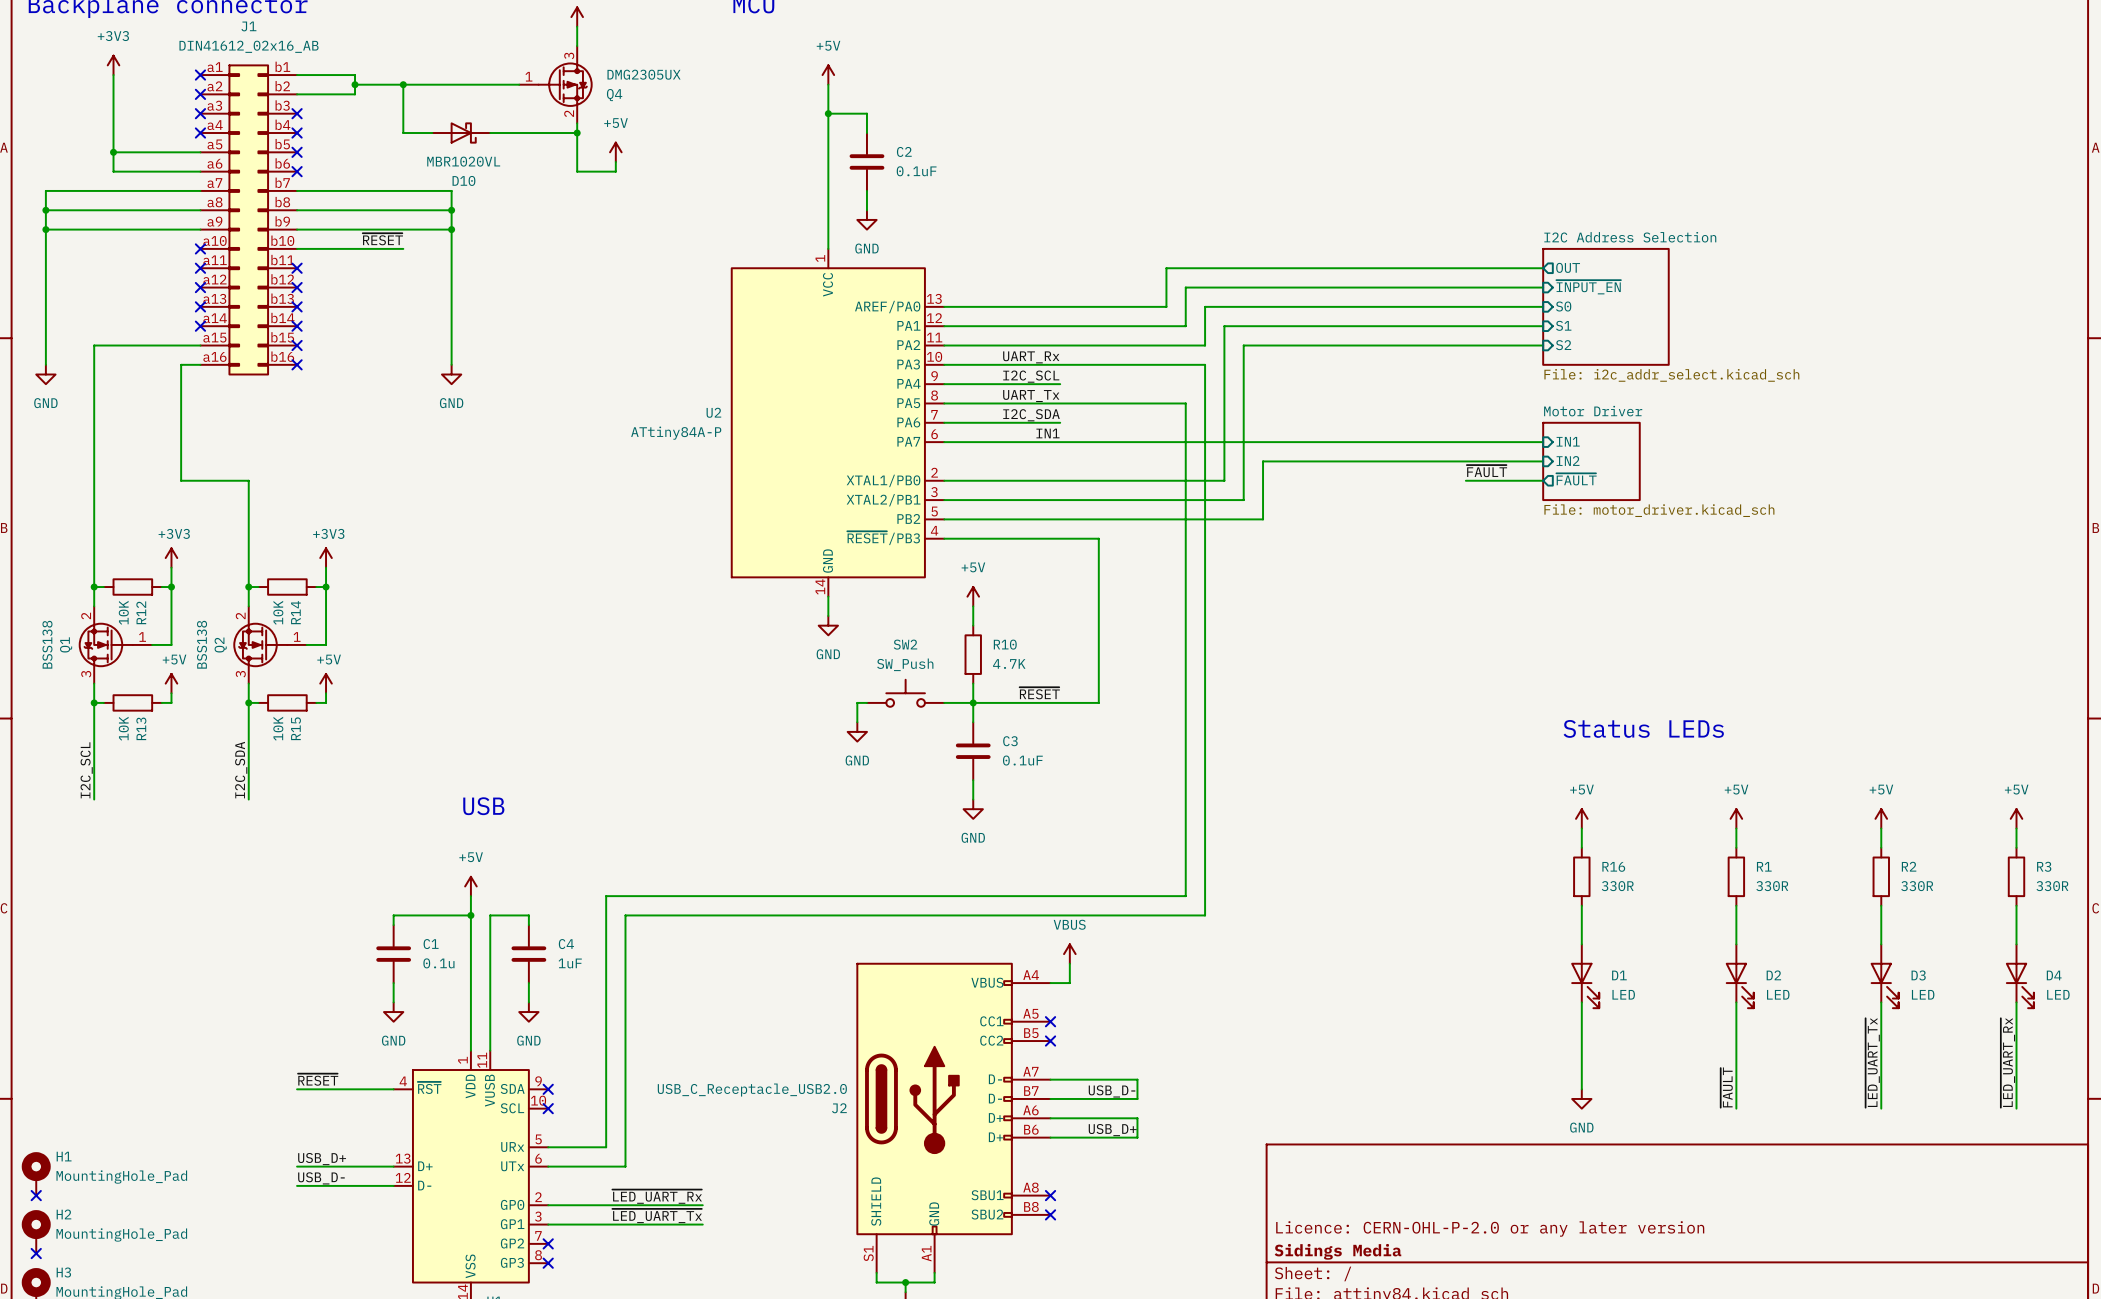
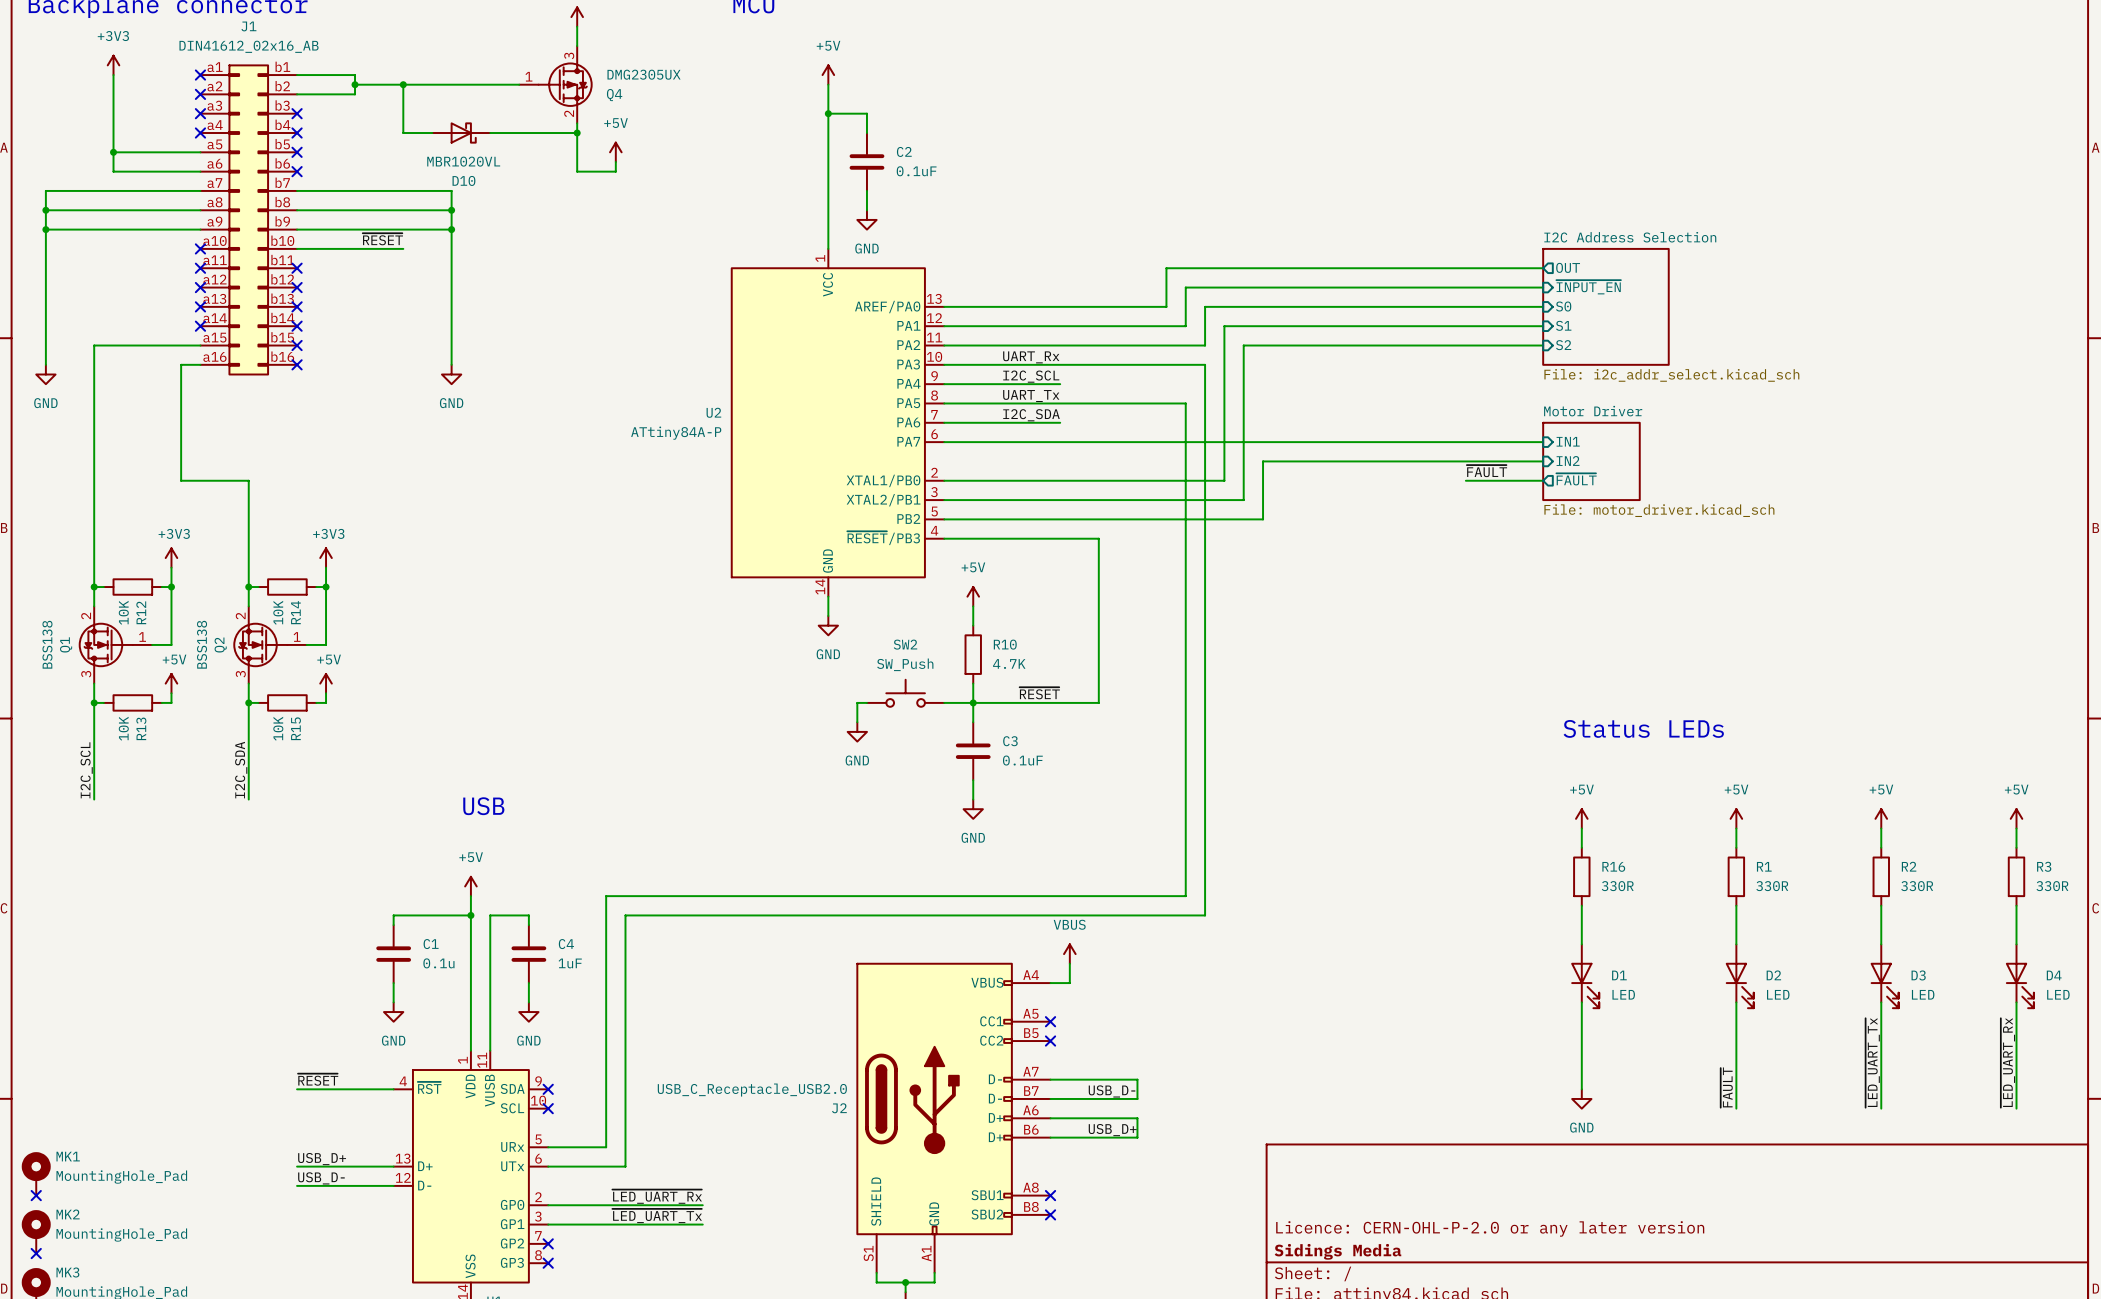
label: IN1 (1047, 433) -> none
H1 name: H1 (64, 1156) -> MK1 (68, 1156)
H2 name: H2 (63, 1214) -> MK2 (68, 1214)
H3 name: H3 (63, 1272) -> MK3 (67, 1272)

